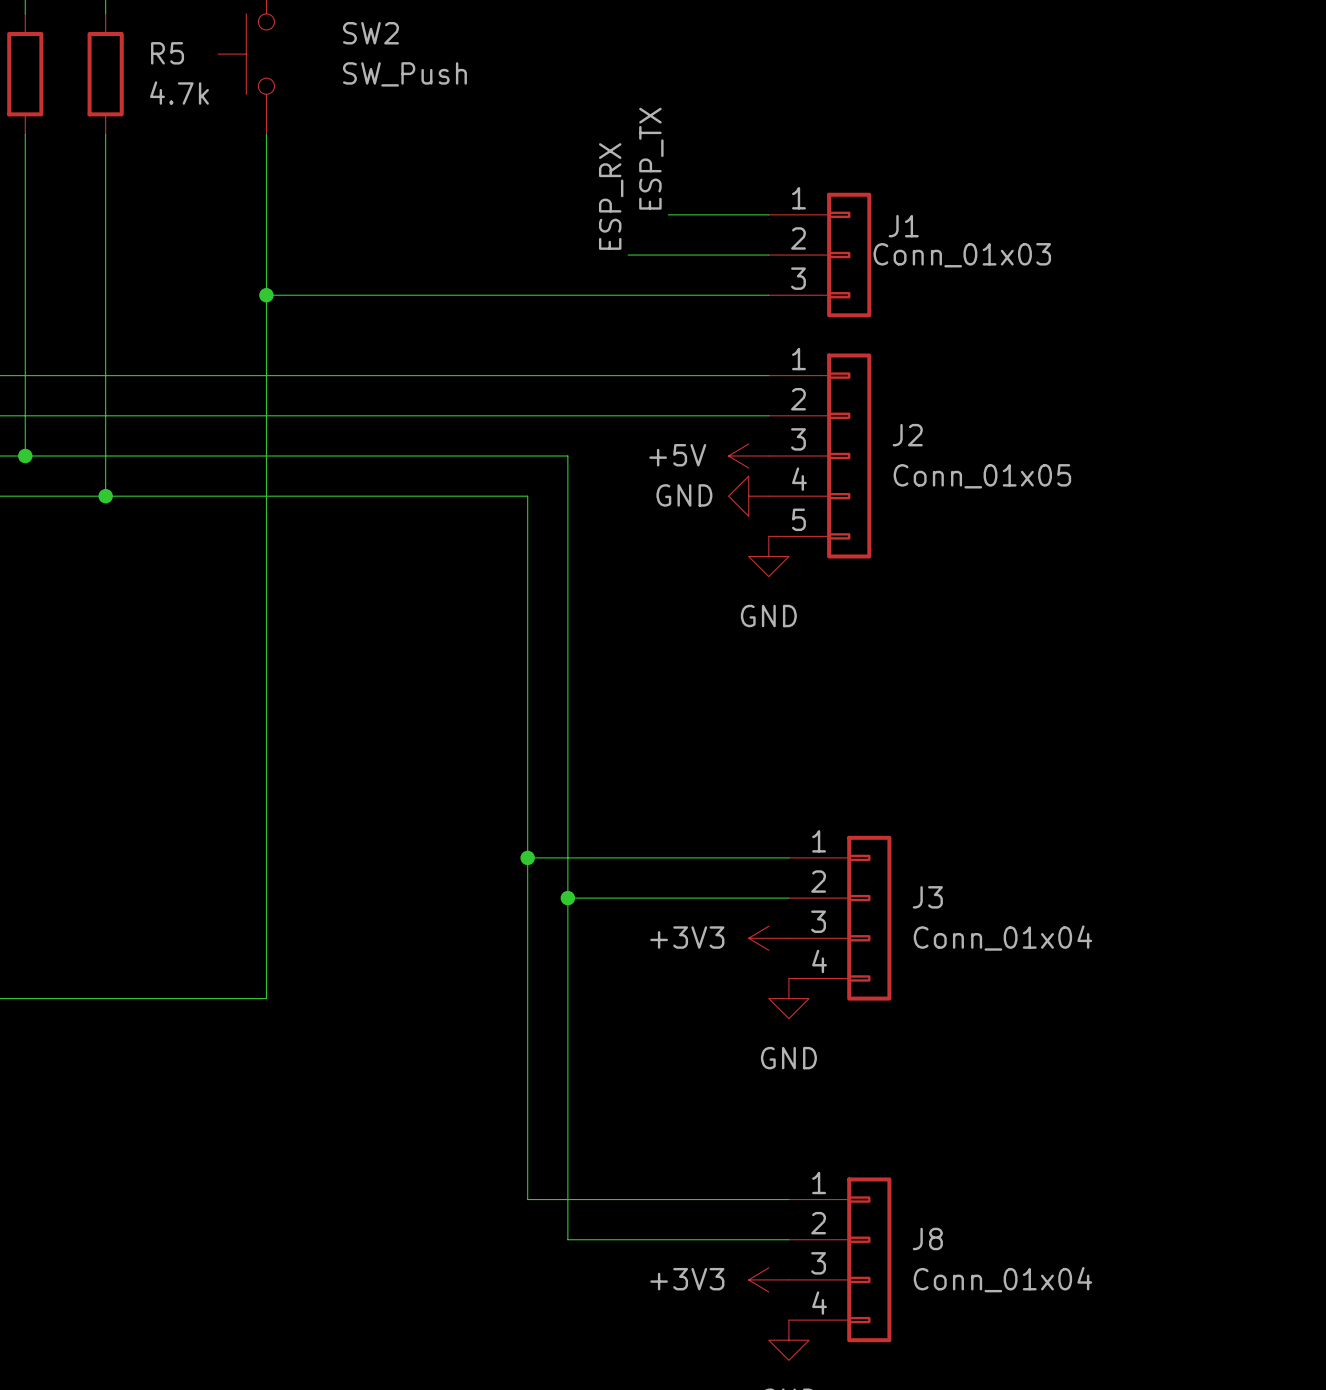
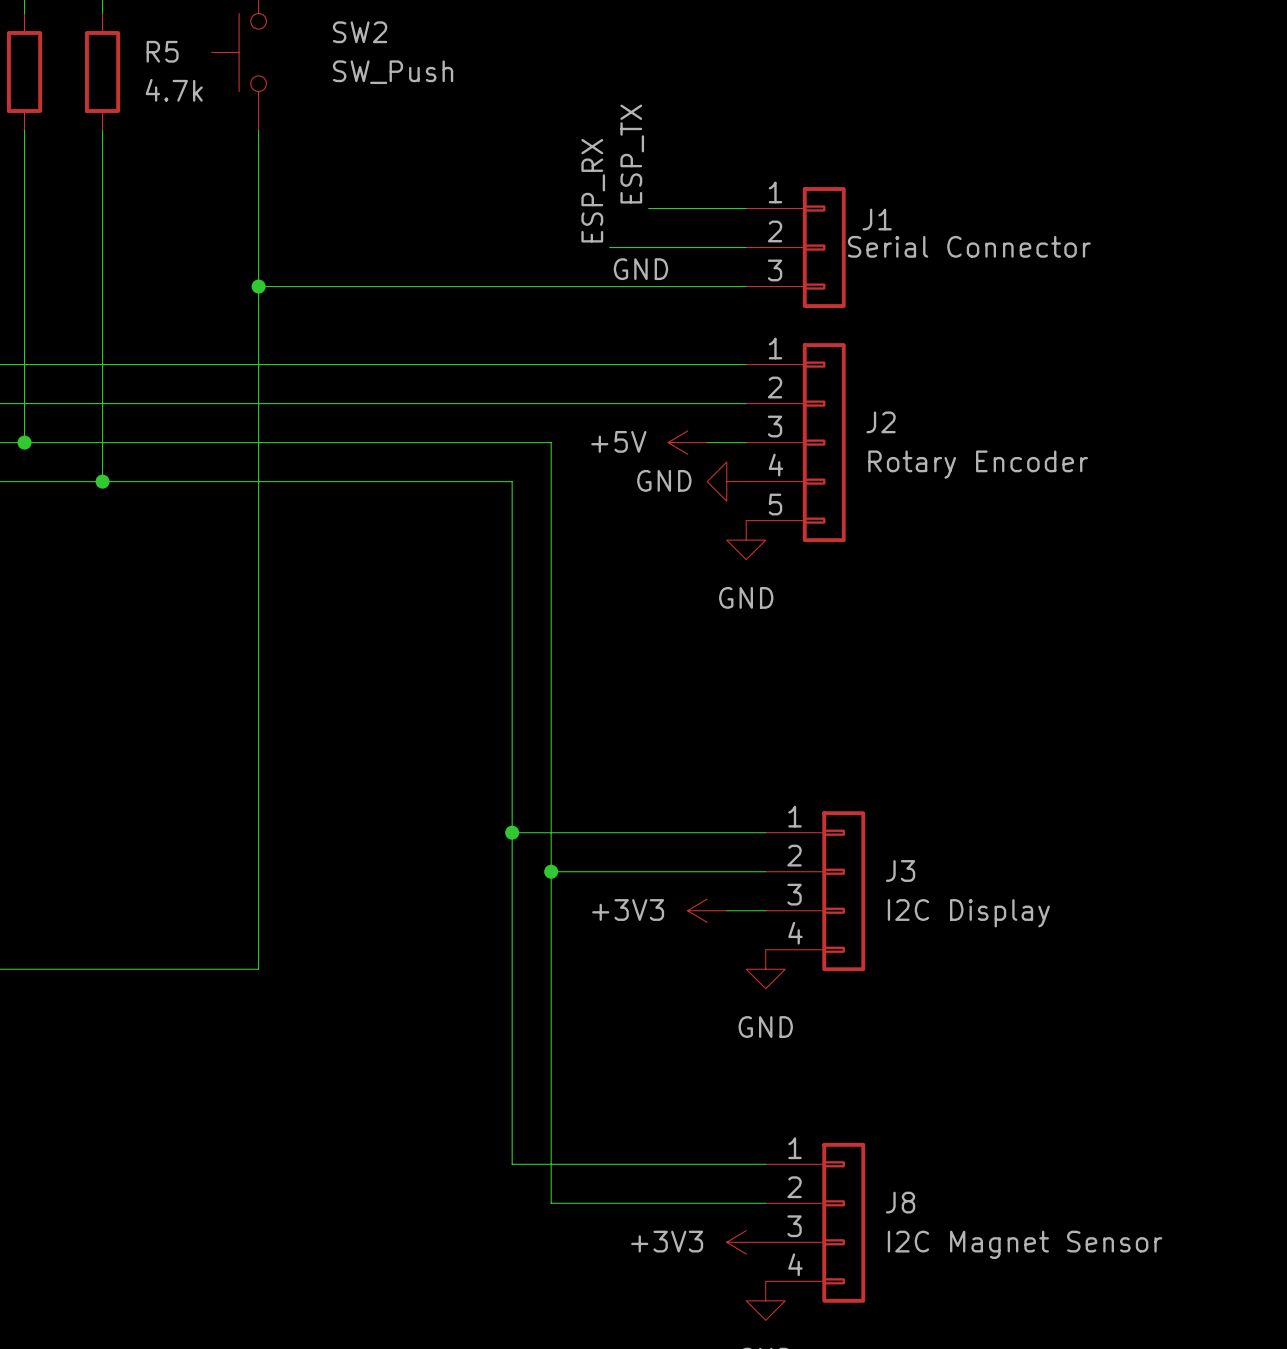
J1 value: Conn_01x03 (962, 255) -> Serial Connector (969, 246)
label: none -> GND (640, 269)
power symbol position: +5V (748, 455) -> +5V (687, 442)
J2 value: Conn_01x05 (982, 476) -> Rotary Encoder (978, 464)
power symbol position: +3V3 (768, 938) -> +3V3 (707, 910)
J3 value: Conn_01x04 (1002, 938) -> I2C Display (968, 913)
J8 value: Conn_01x04 (1002, 1279) -> I2C Magnet Sensor (1025, 1244)

